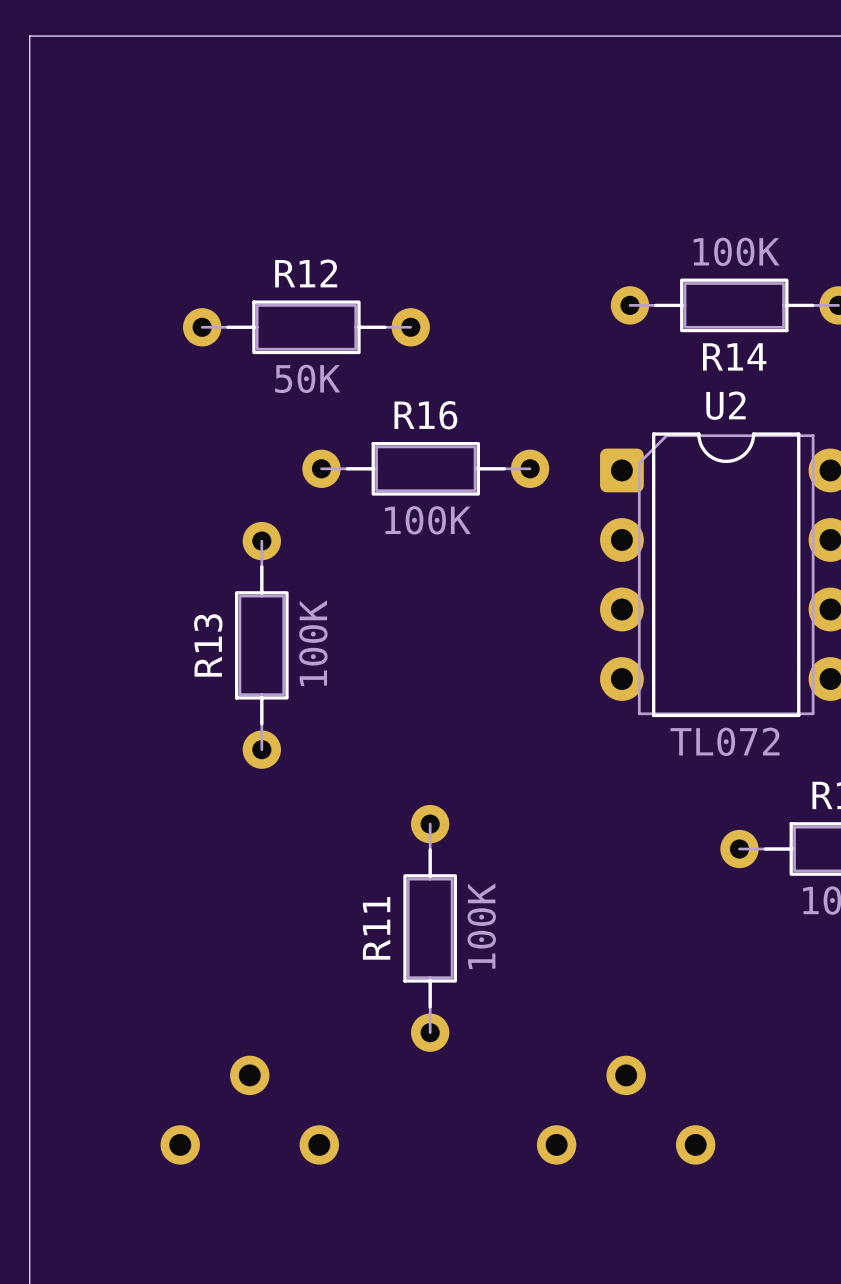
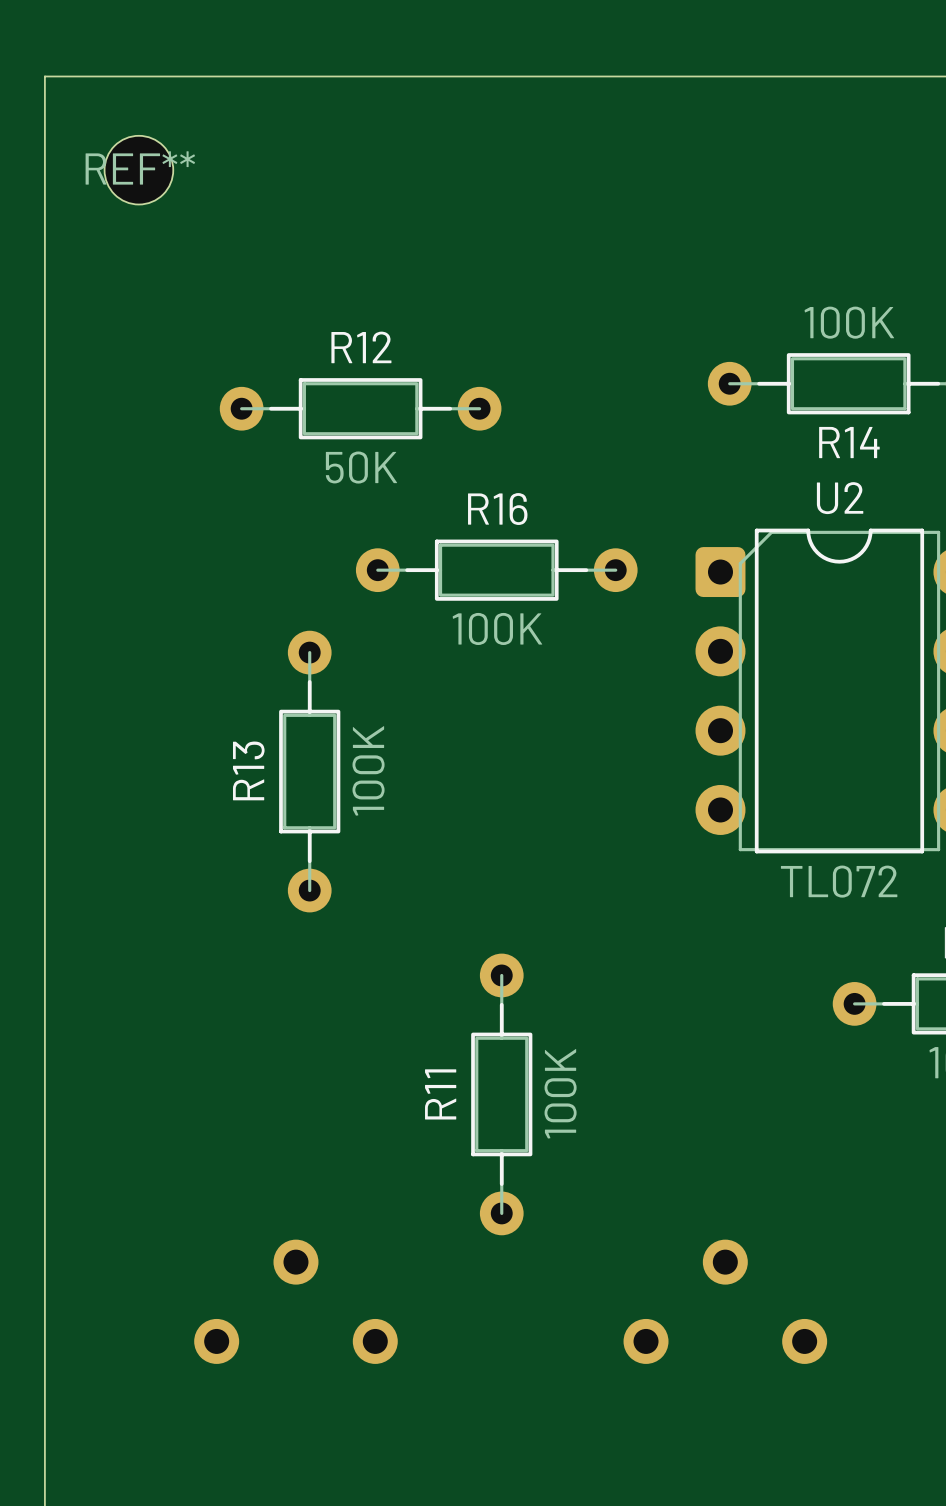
REF**: none -> (138, 170)

